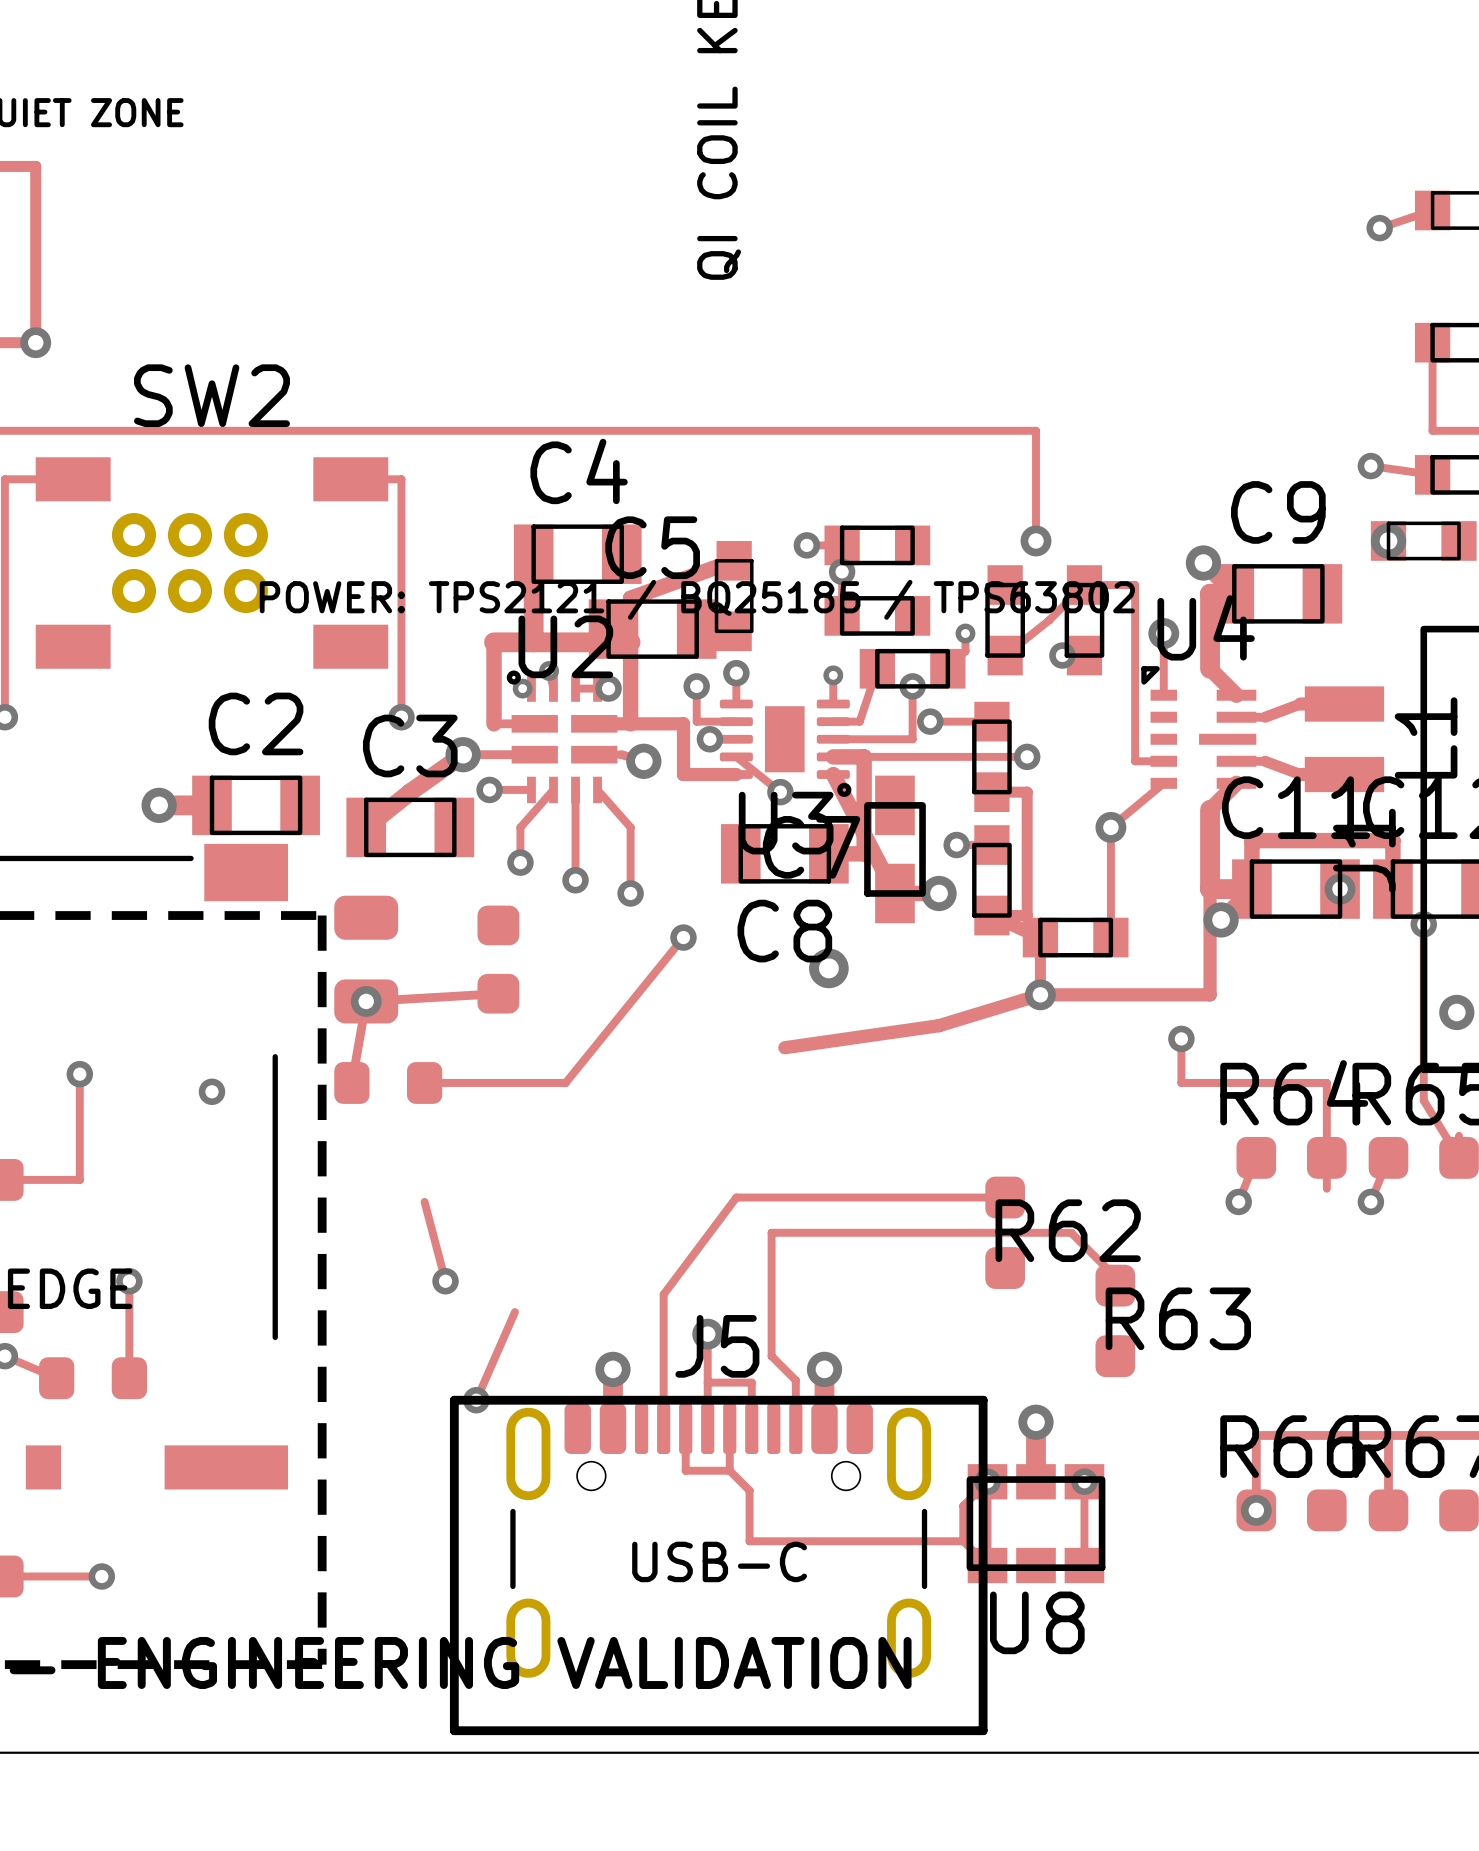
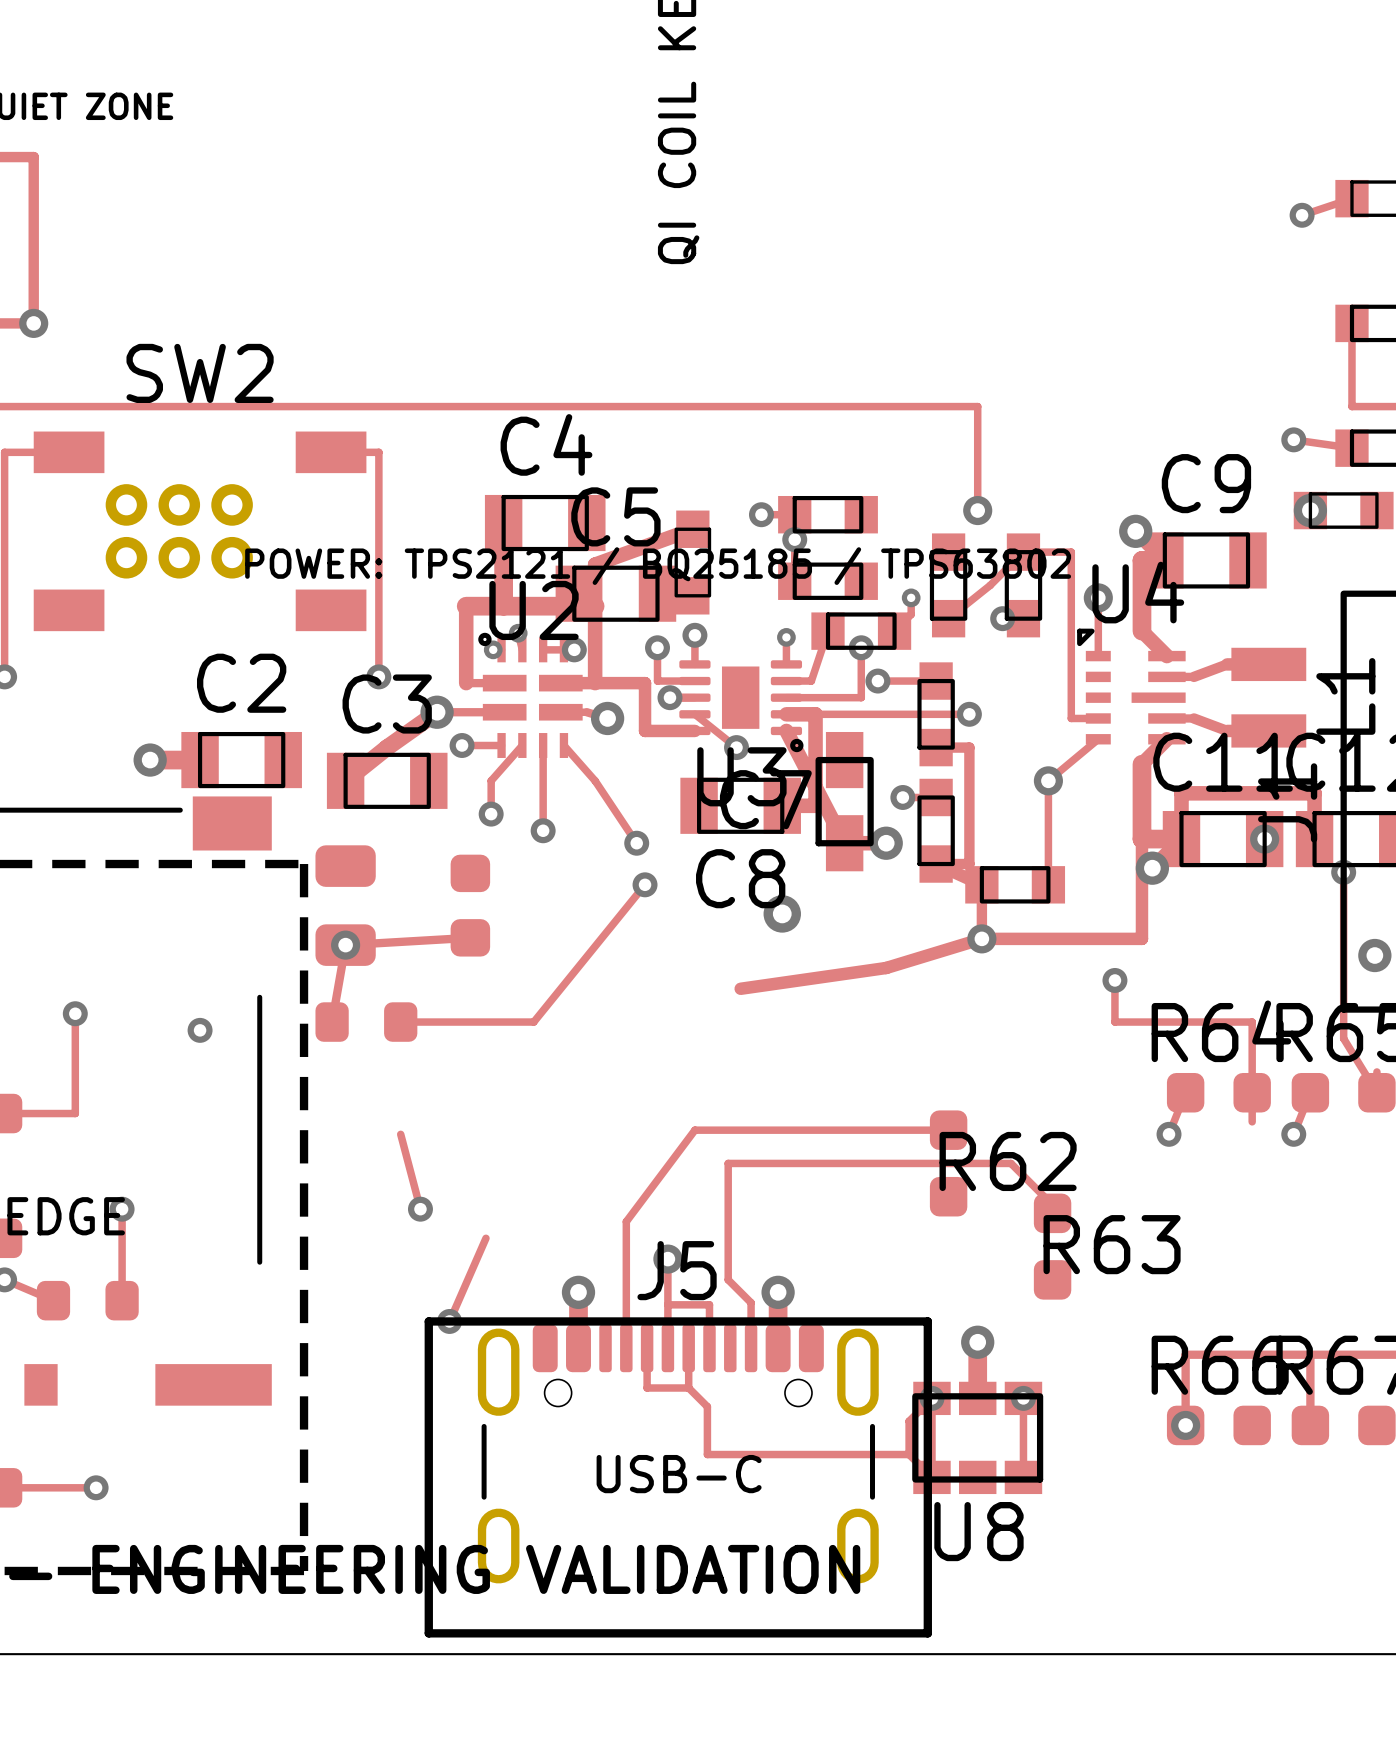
track: (630, 827) (630, 893) -> (595, 780) (636, 843)
via position: (630, 893) -> (636, 843)

